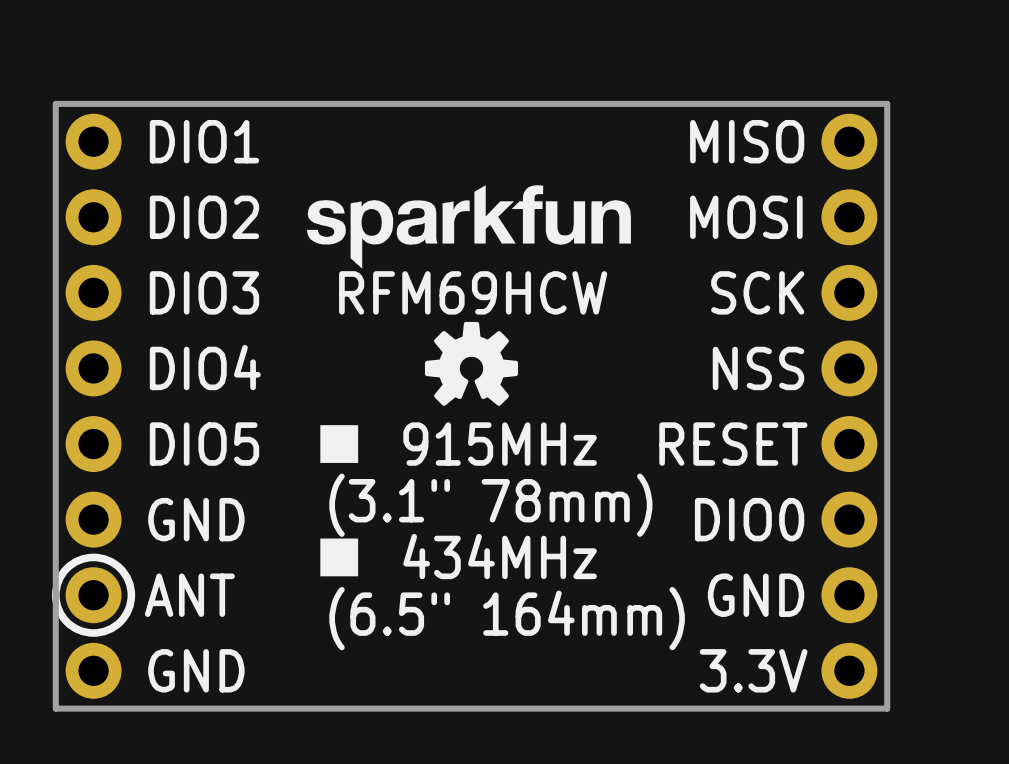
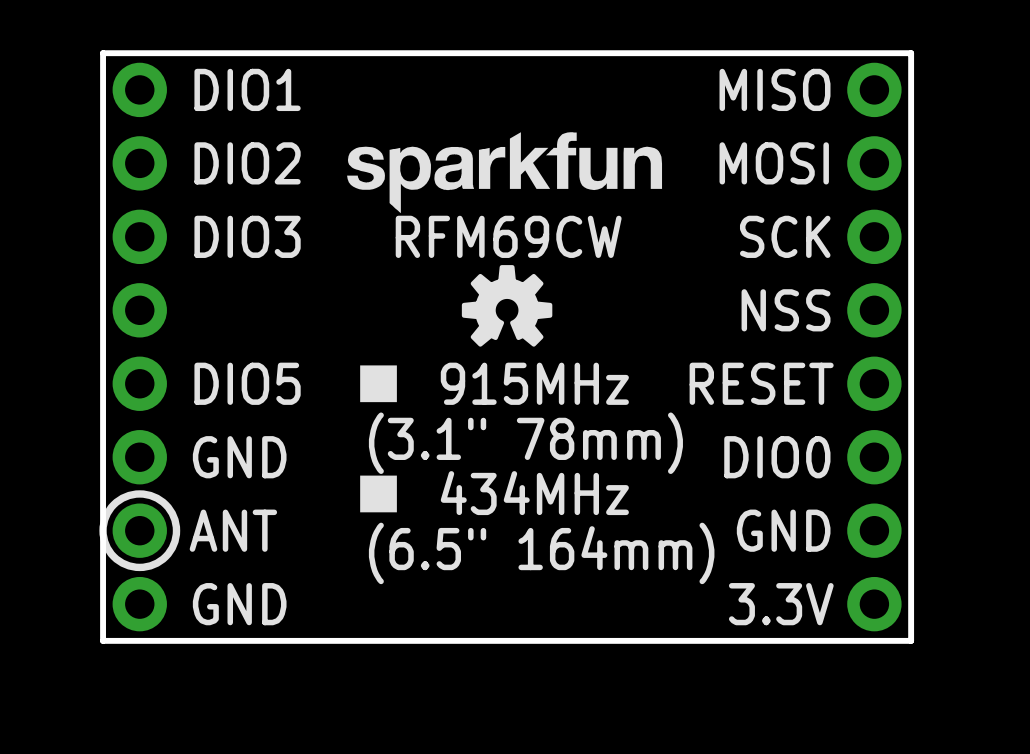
text: RFM69HCW (473, 292) -> RFM69CW (508, 236)
text: DIO4 (205, 367) -> none

